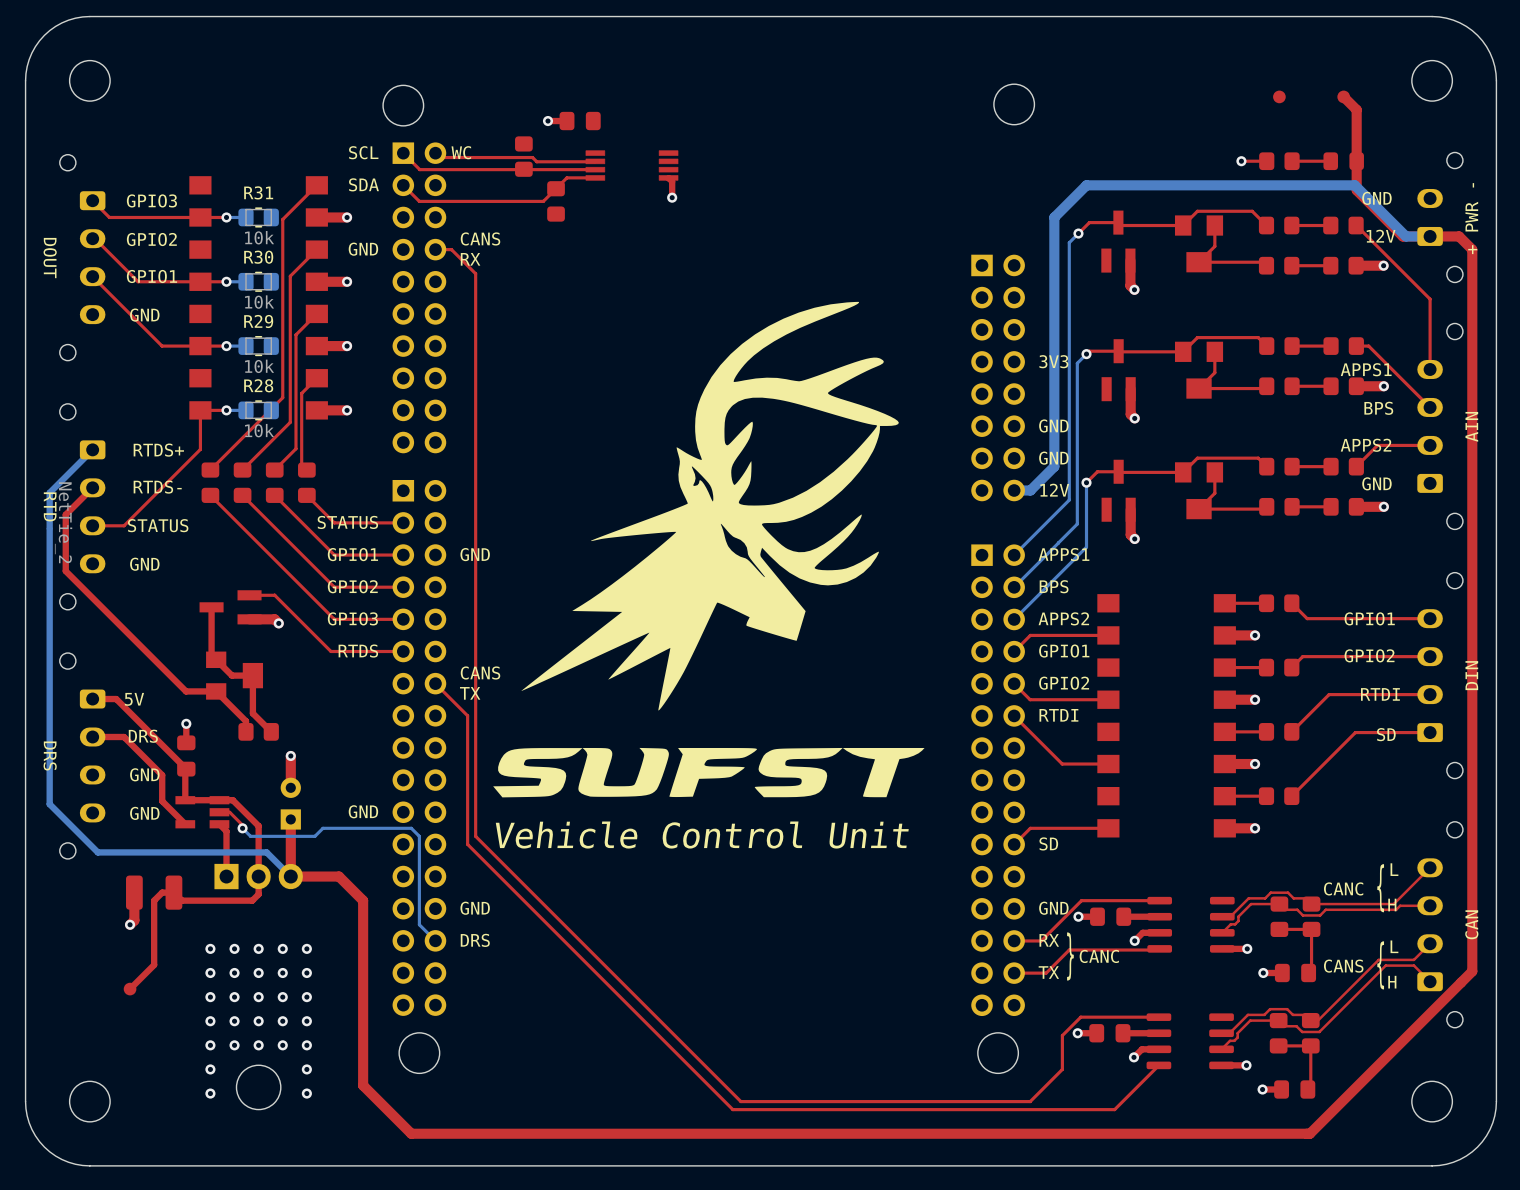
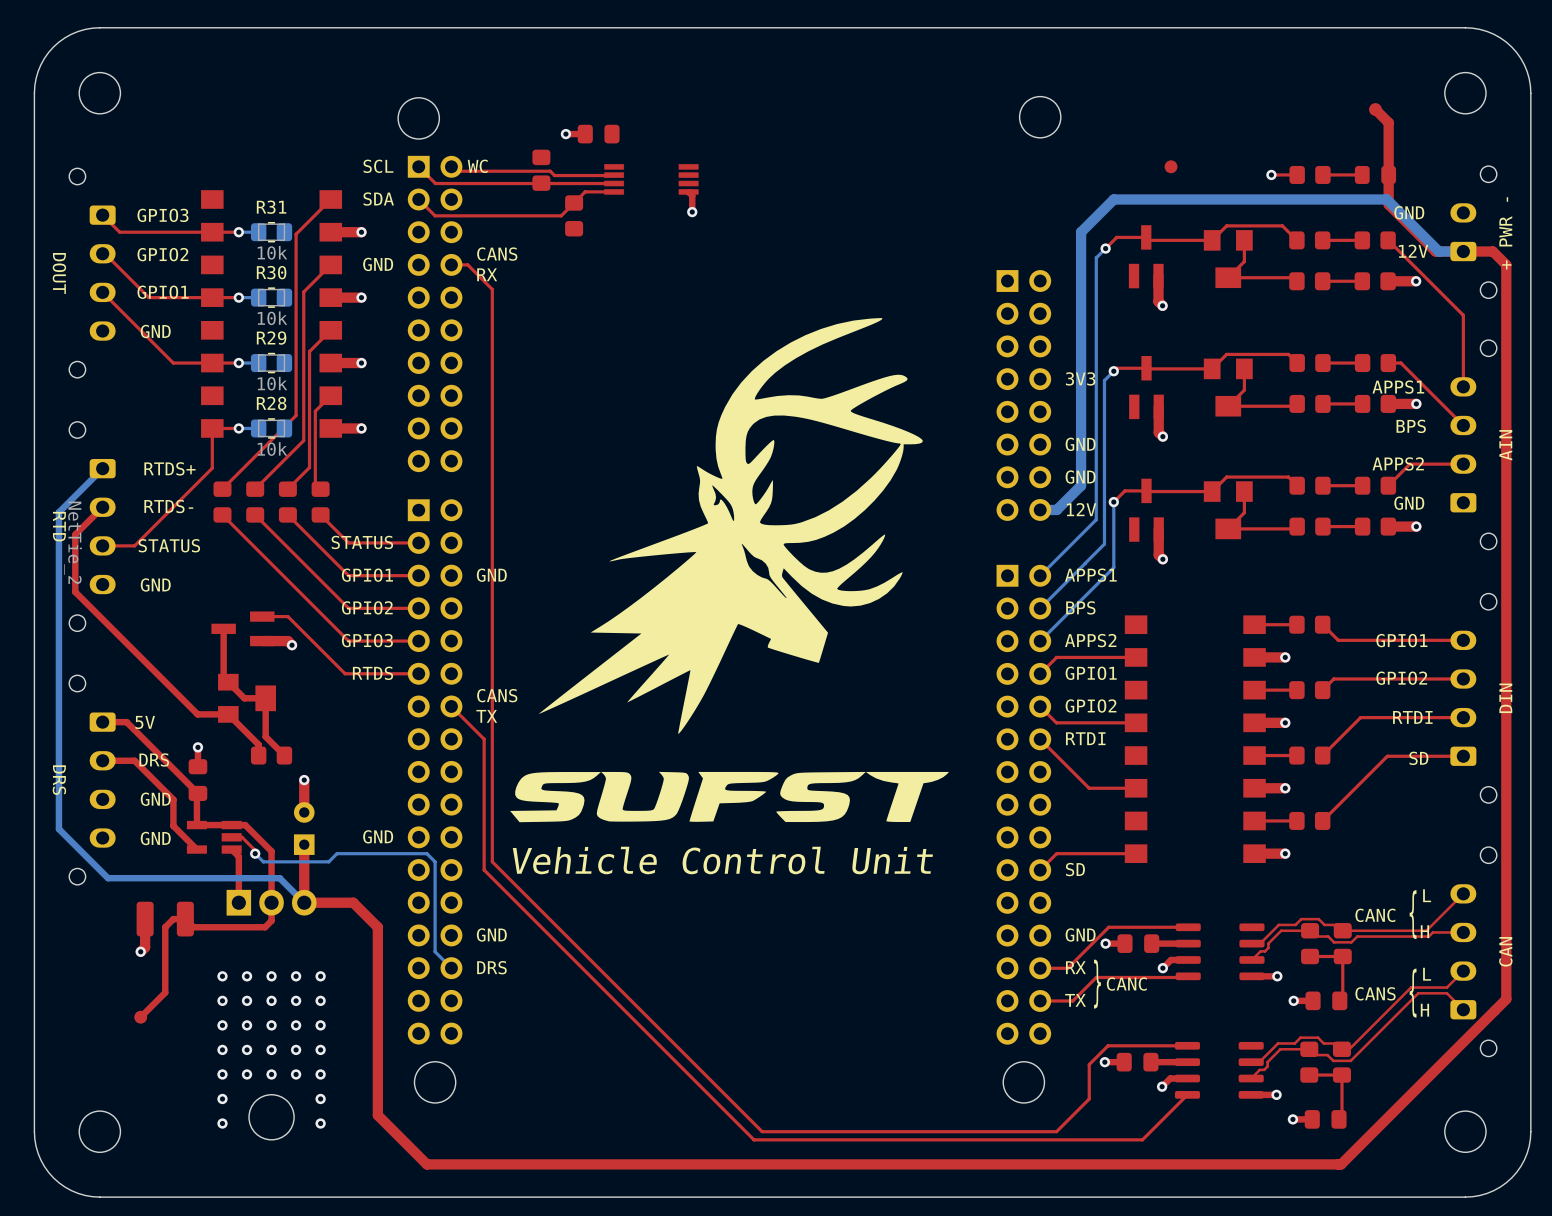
part position: (1279, 96) -> (1171, 166)

